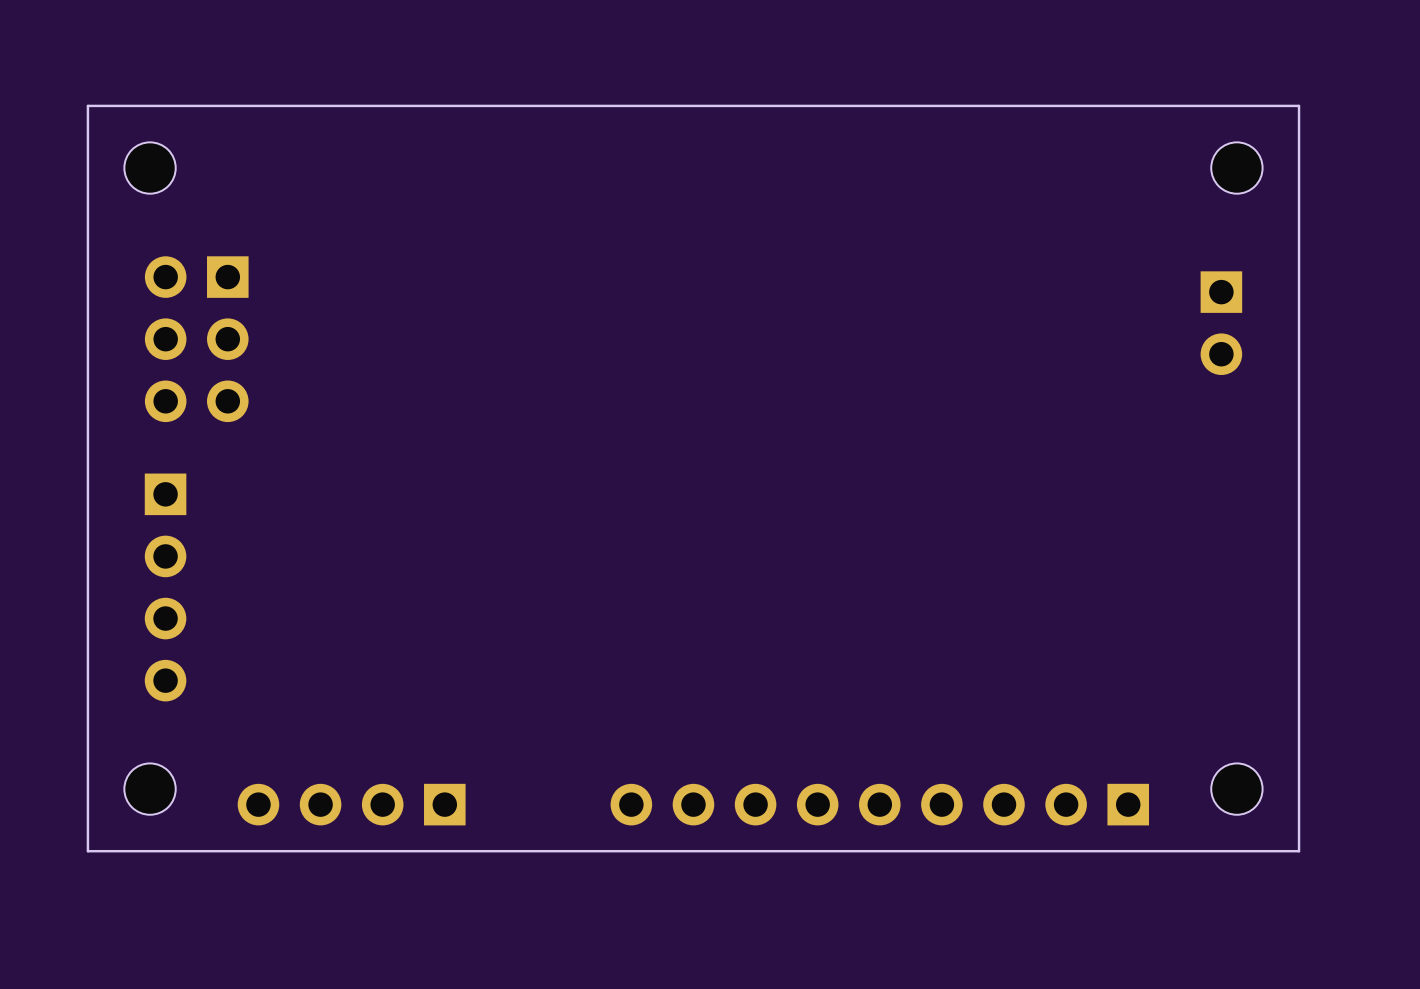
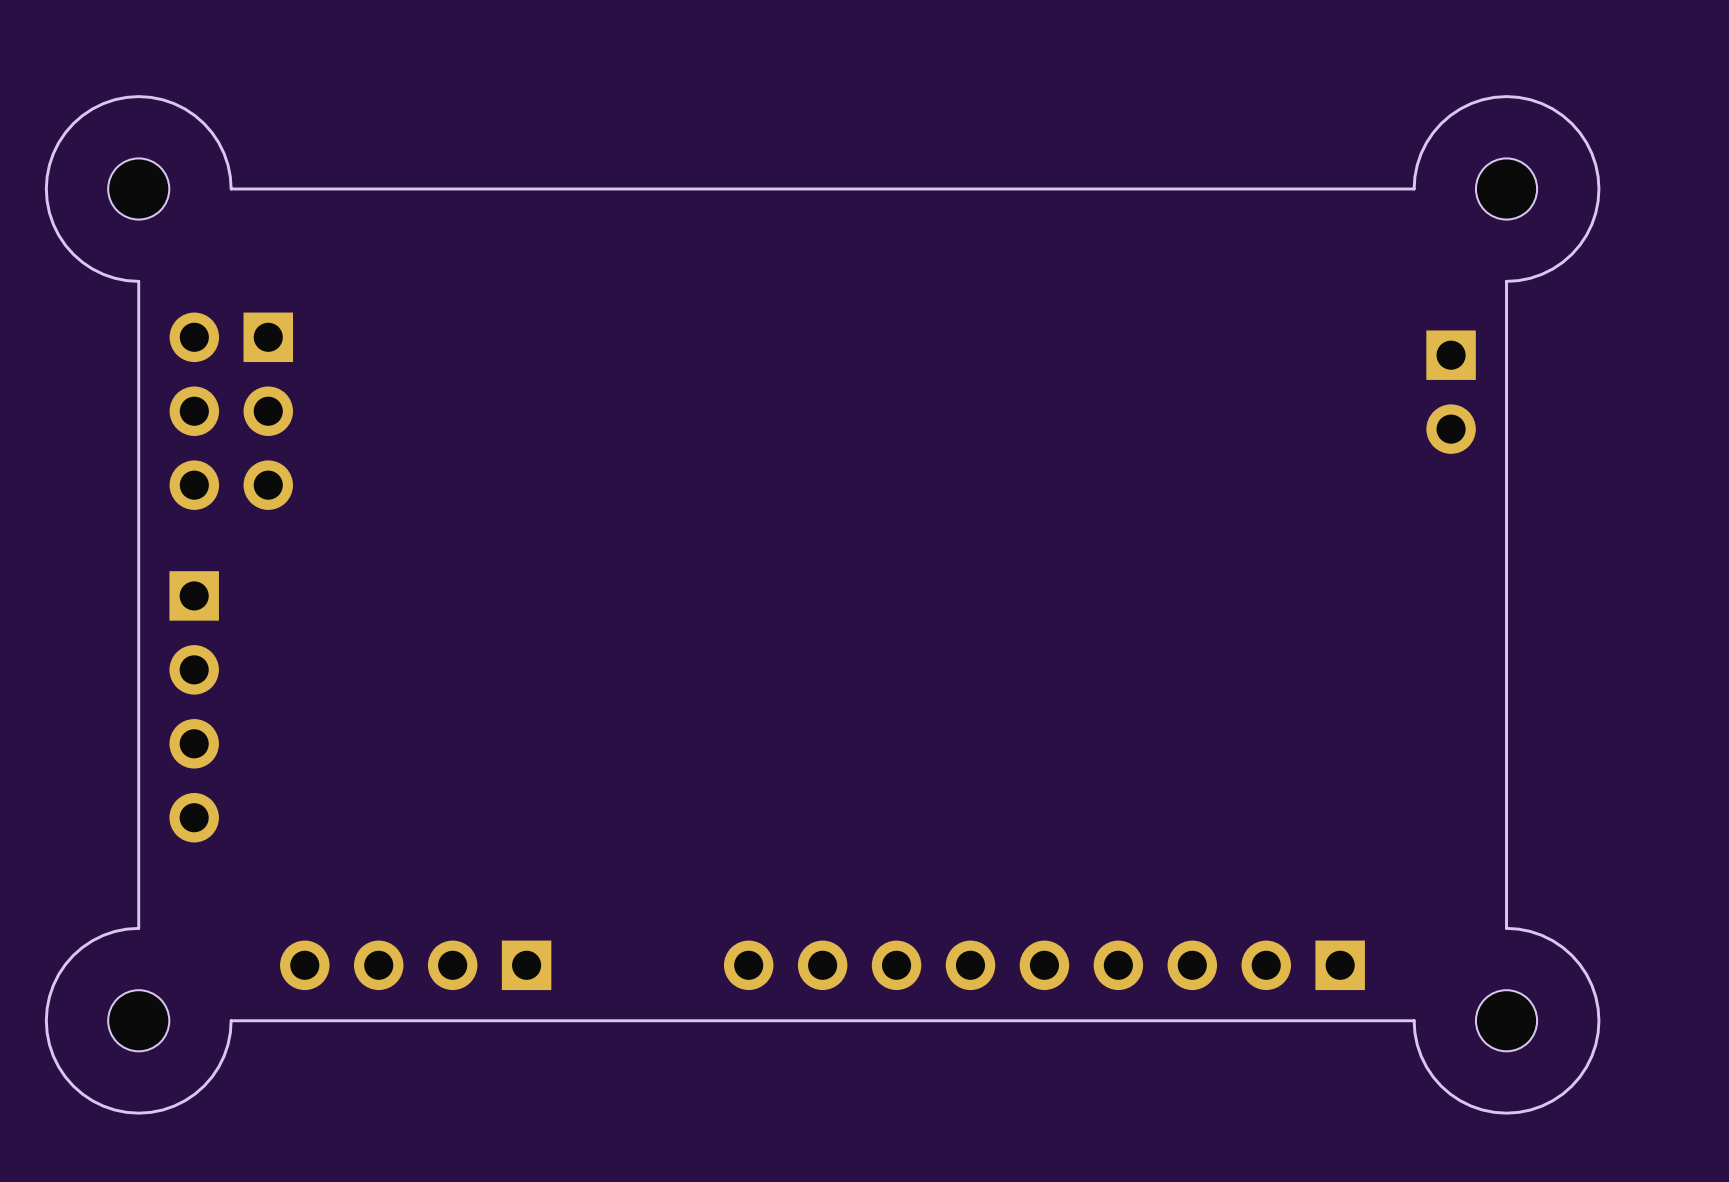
part position: (150, 168) -> (138, 188)
part position: (1236, 168) -> (1506, 188)
part position: (150, 789) -> (138, 1020)
part position: (1236, 789) -> (1506, 1020)
board edge: (1190, 851) (1299, 851) (1299, 105) (87, 105) (87, 851) (196, 851) -> (1414, 1020) (1414, 1032) (1421, 1056) (1426, 1066) (1441, 1086) (1450, 1094) (1471, 1106) (1482, 1110) (1506, 1113) (1518, 1112) (1541, 1106) (1562, 1094) (1571, 1086) (1586, 1066) (1591, 1056) (1598, 1032) (1598, 1020) (1595, 996) (1591, 985) (1579, 964) (1562, 947) (1552, 940) (1530, 931) (1506, 928) (1506, 281) (1530, 278) (1552, 269) (1562, 262) (1579, 245) (1586, 235) (1595, 212) (1598, 188) (1595, 165) (1586, 142) (1571, 123) (1562, 115) (1541, 103) (1518, 97) (1506, 96) (1482, 99) (1460, 108) (1441, 123) (1426, 142) (1417, 165) (1414, 188) (231, 188) (230, 176) (224, 153) (212, 132) (204, 123) (195, 115) (174, 103) (150, 97) (126, 97) (114, 99) (92, 108) (73, 123) (58, 142) (53, 153) (47, 176) (46, 188) (47, 201) (53, 224) (58, 235) (73, 254) (82, 262) (103, 274) (126, 280) (138, 281) (138, 928) (126, 929) (103, 935) (82, 947) (73, 955) (58, 974) (53, 985) (47, 1008) (47, 1032) (53, 1056) (58, 1066) (65, 1077) (82, 1094) (103, 1106) (114, 1110) (138, 1113) (162, 1110) (174, 1106) (184, 1100) (204, 1086) (218, 1066) (224, 1056) (228, 1044) (231, 1020)

